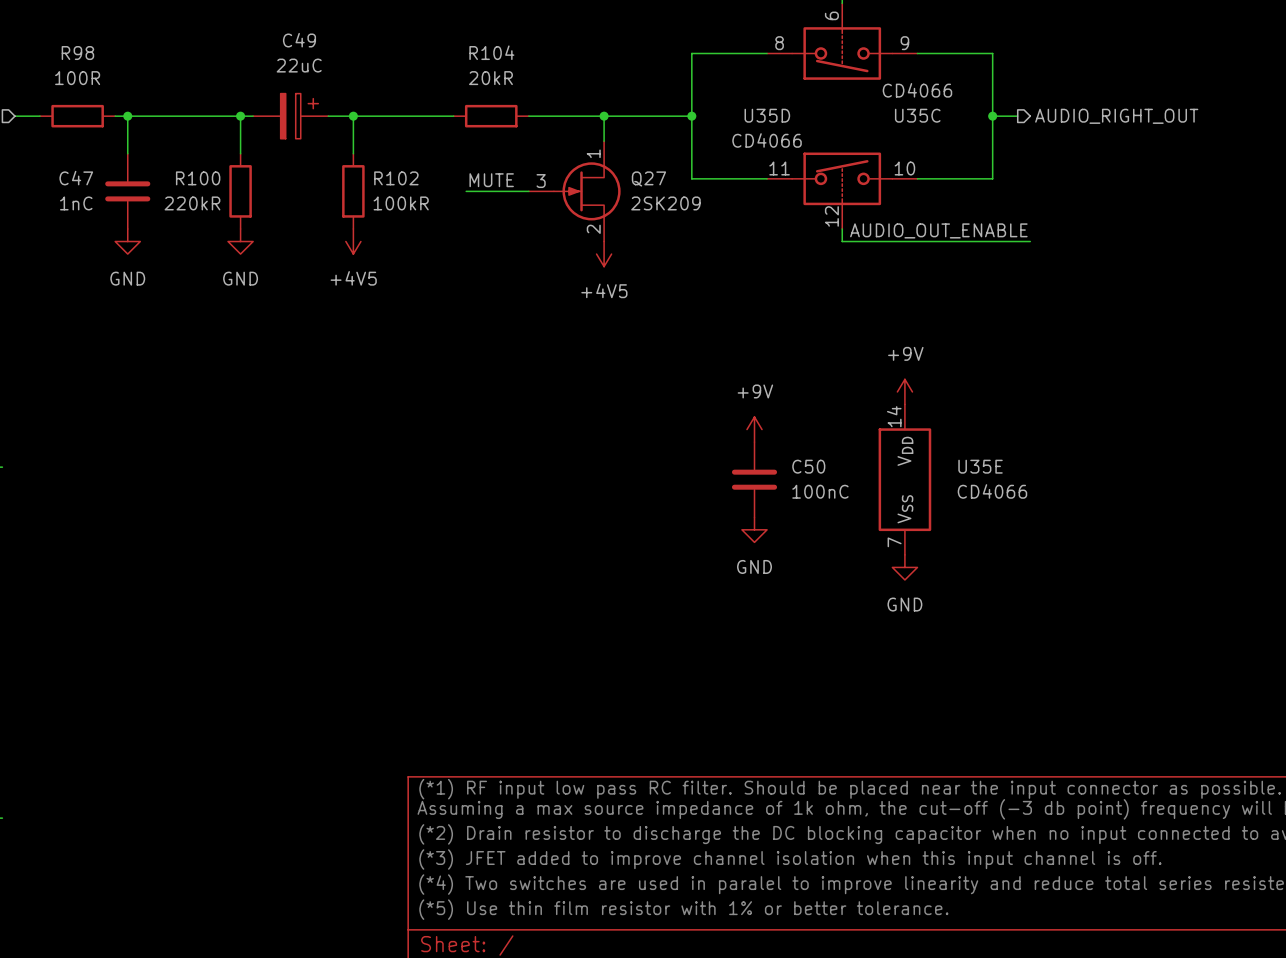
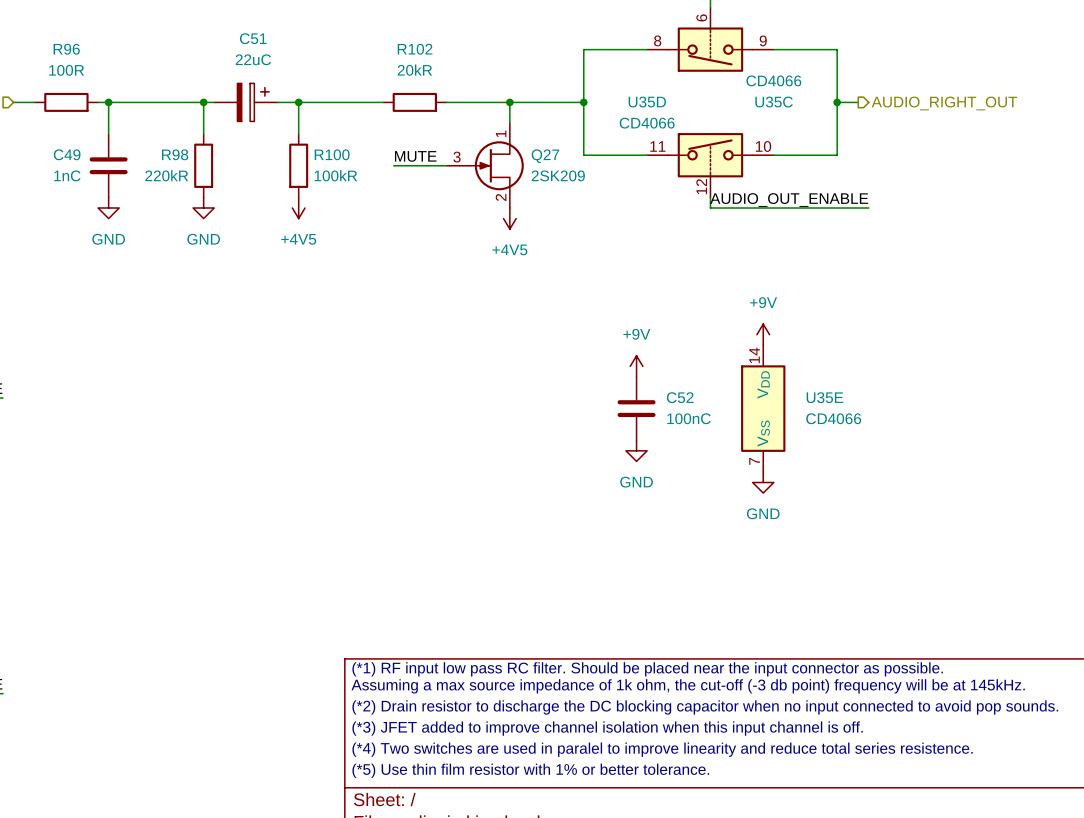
C49 name: C49 (299, 40) -> C51 (253, 38)
R104 name: R104 (491, 52) -> R102 (415, 49)
R98 name: R98 (77, 53) -> R96 (66, 49)
C47 name: C47 (76, 178) -> C49 (67, 154)
R100 name: R100 (198, 178) -> R98 (175, 154)
R102 name: R102 (396, 178) -> R100 (332, 154)
C50 name: C50 (808, 466) -> C52 (680, 397)

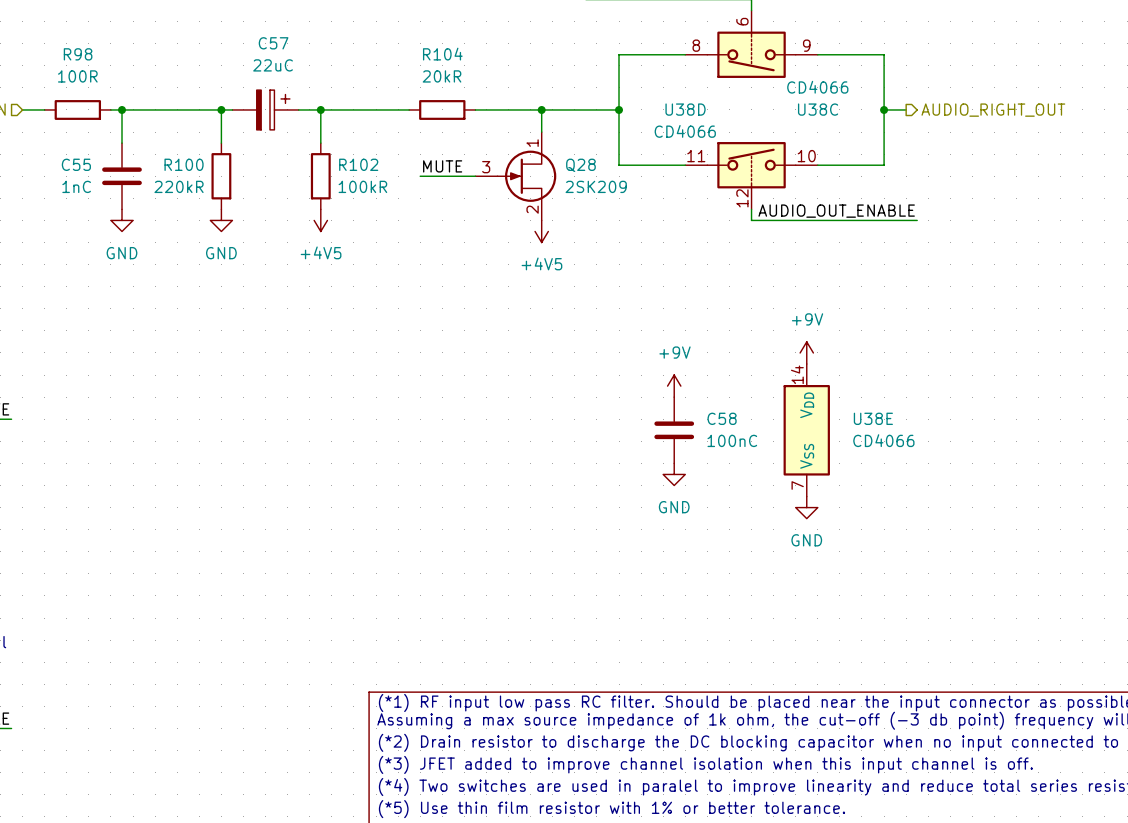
C51 name: C51 (253, 38) -> C57 (273, 43)
R96 name: R96 (66, 49) -> R98 (78, 54)
R102 name: R102 (415, 49) -> R104 (442, 54)
U35D name: U35D (647, 102) -> U38D (685, 109)
U35C name: U35C (774, 102) -> U38C (818, 109)
C49 name: C49 (67, 154) -> C55 (76, 164)
R98 name: R98 (175, 154) -> R100 (184, 164)
R100 name: R100 (332, 154) -> R102 (358, 164)
Q27 name: Q27 (545, 156) -> Q28 (580, 165)
C52 name: C52 (680, 397) -> C58 (722, 418)
U35E name: U35E (824, 397) -> U38E (873, 418)

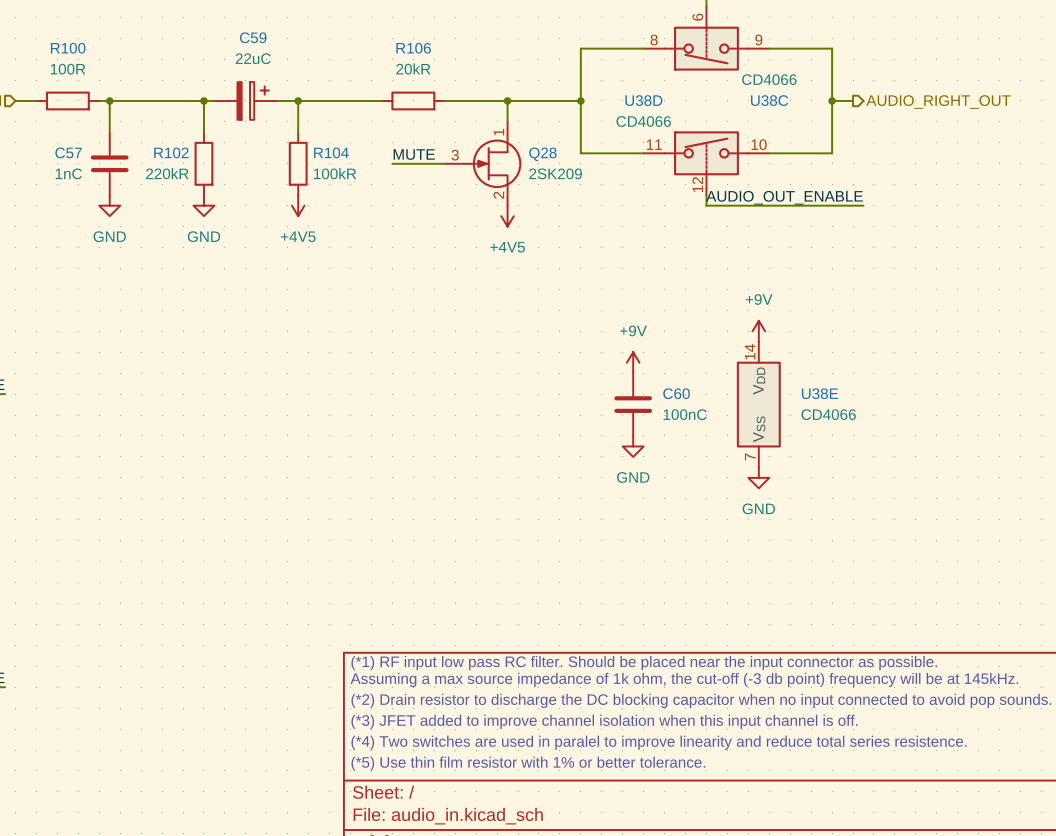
C57 name: C57 (273, 43) -> C59 (253, 37)
R98 name: R98 (78, 54) -> R100 (68, 48)
R104 name: R104 (442, 54) -> R106 (413, 48)
C55 name: C55 (76, 164) -> C57 (68, 152)
R100 name: R100 (184, 164) -> R102 (171, 152)
R102 name: R102 (358, 164) -> R104 (331, 152)
C58 name: C58 (722, 418) -> C60 (676, 393)

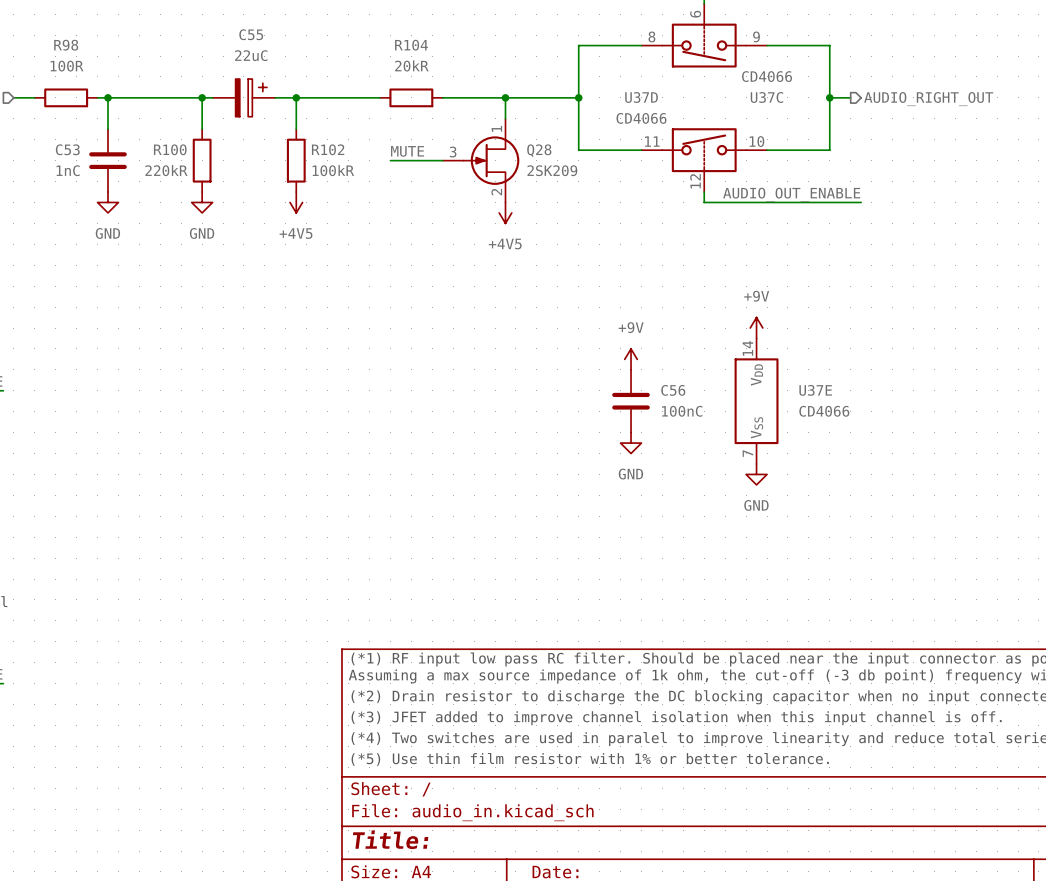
C59 name: C59 (253, 37) -> C55 (251, 34)
R100 name: R100 (68, 48) -> R98 (66, 45)
R106 name: R106 (413, 48) -> R104 (411, 45)
U38D name: U38D (643, 100) -> U37D (641, 97)
U38C name: U38C (769, 100) -> U37C (766, 97)
C57 name: C57 (68, 152) -> C53 (67, 149)
R102 name: R102 (171, 152) -> R100 (170, 149)
R104 name: R104 (331, 152) -> R102 (328, 149)
C60 name: C60 (676, 393) -> C56 (673, 390)
U38E name: U38E (819, 393) -> U37E (815, 390)

